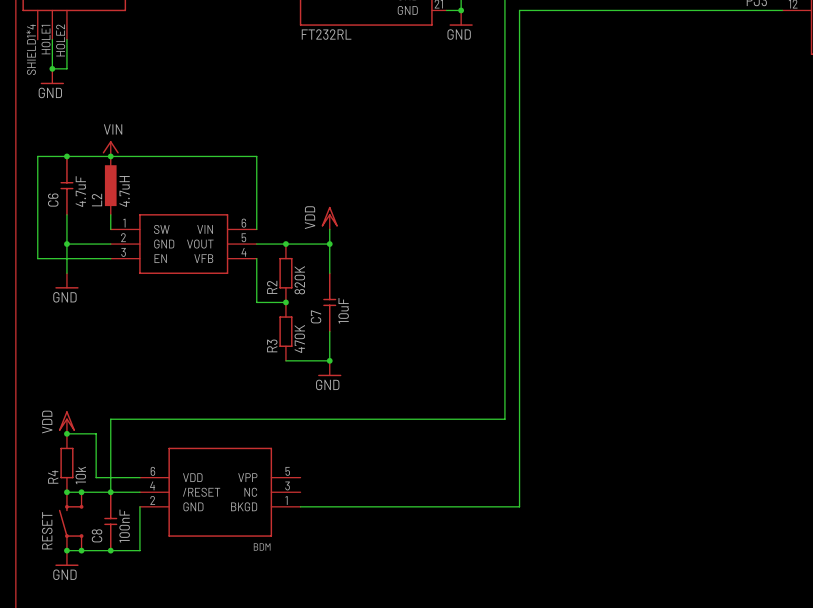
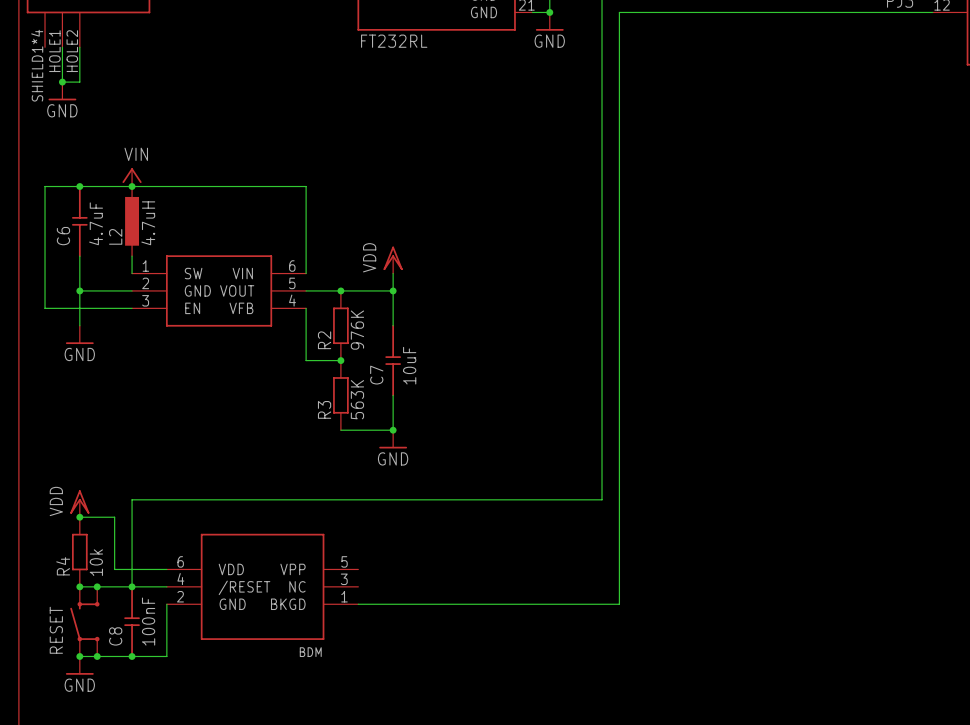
R2 value: 820K (299, 280) -> 976K (357, 330)
R3 value: 470K (299, 338) -> 563K (357, 399)

